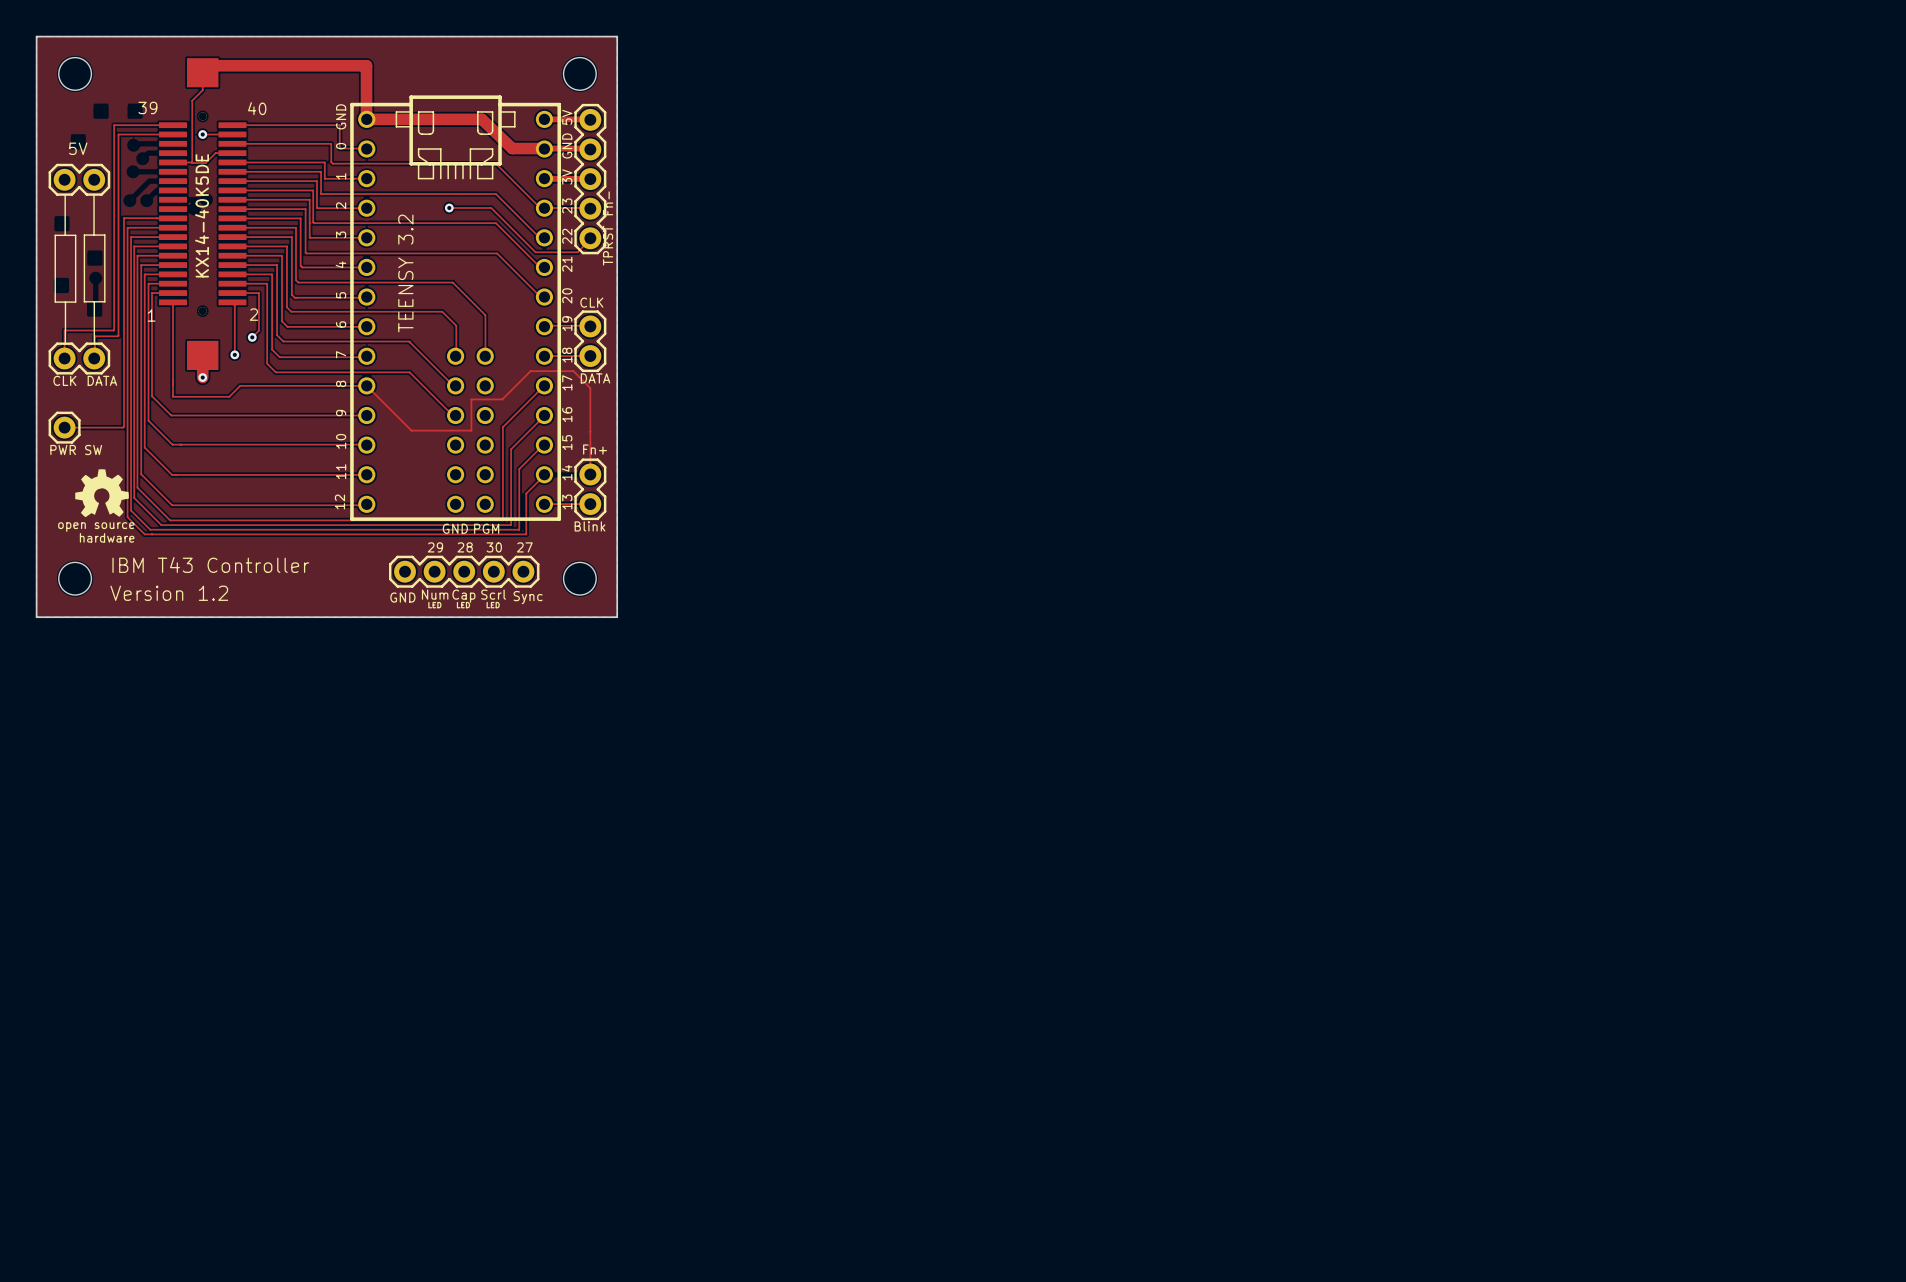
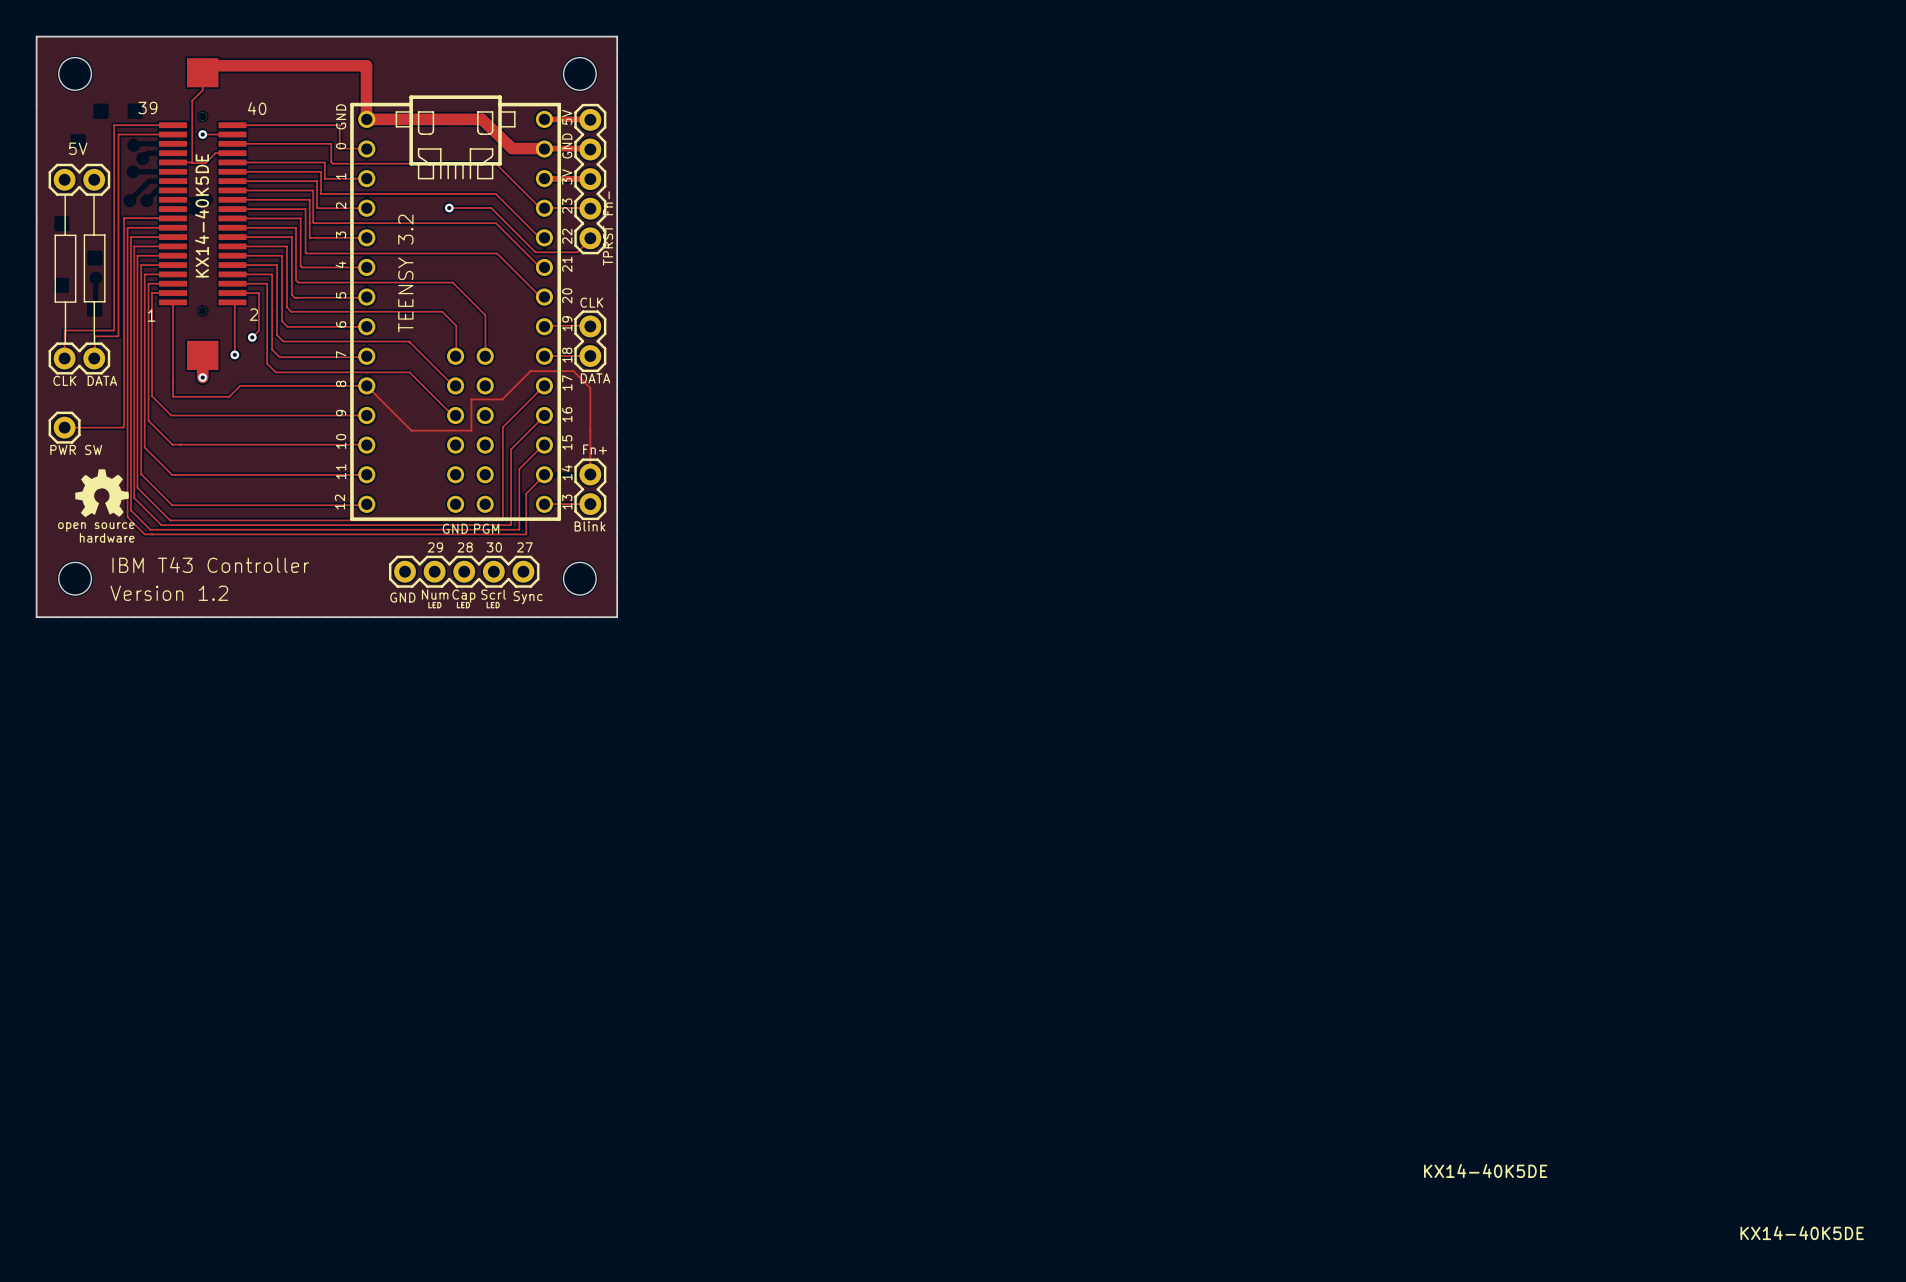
drawing: none -> [1423, 1164, 1548, 1179]
drawing: none -> [1740, 1226, 1864, 1241]

